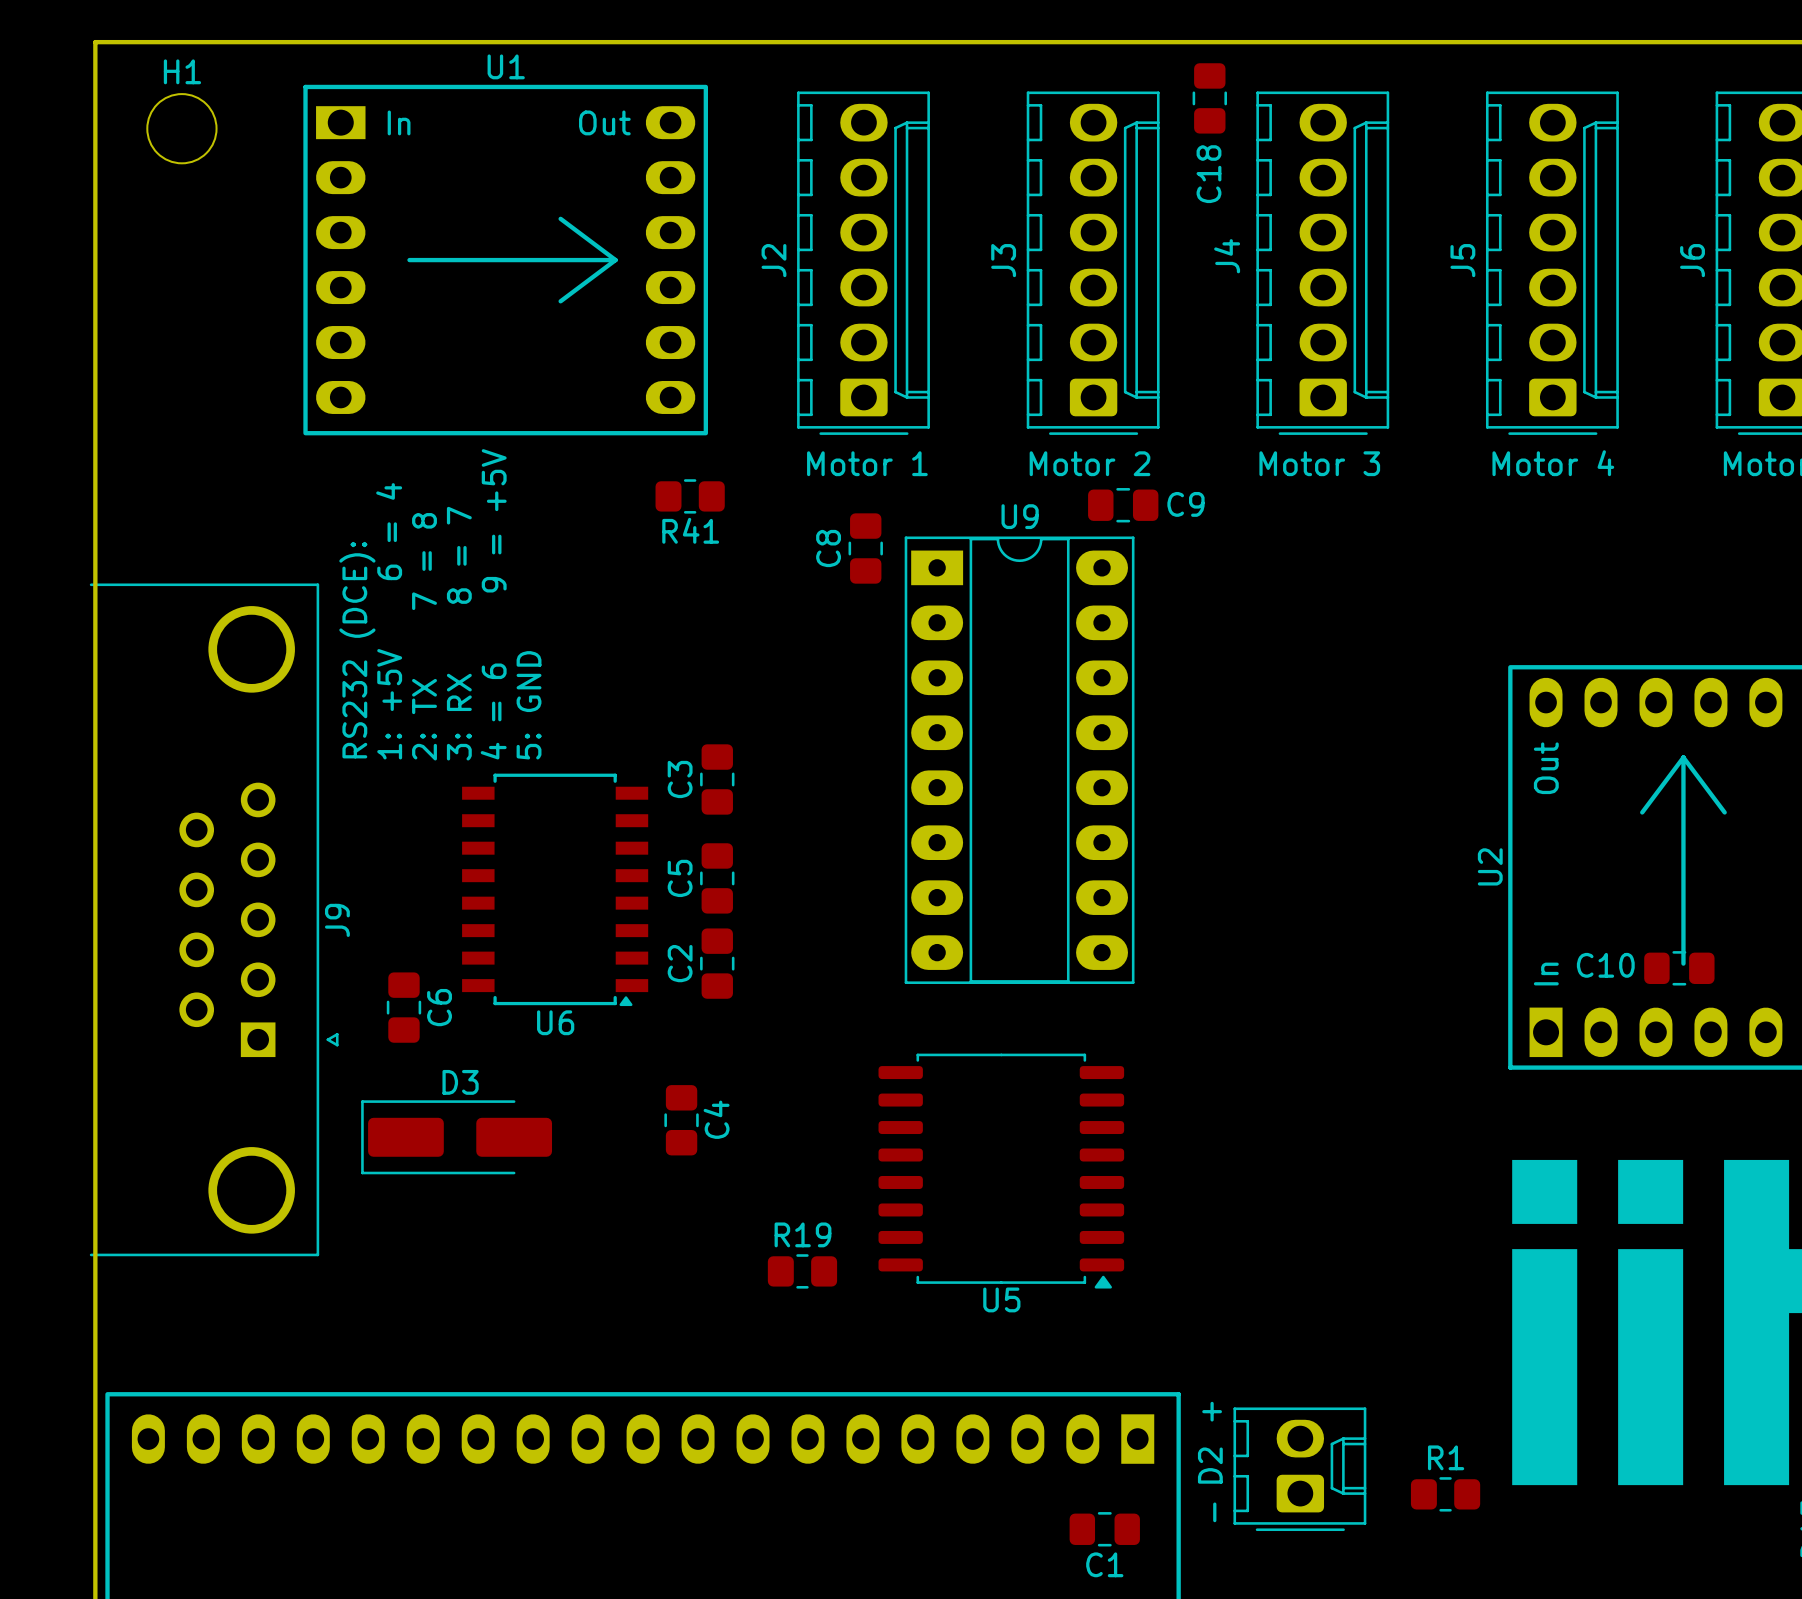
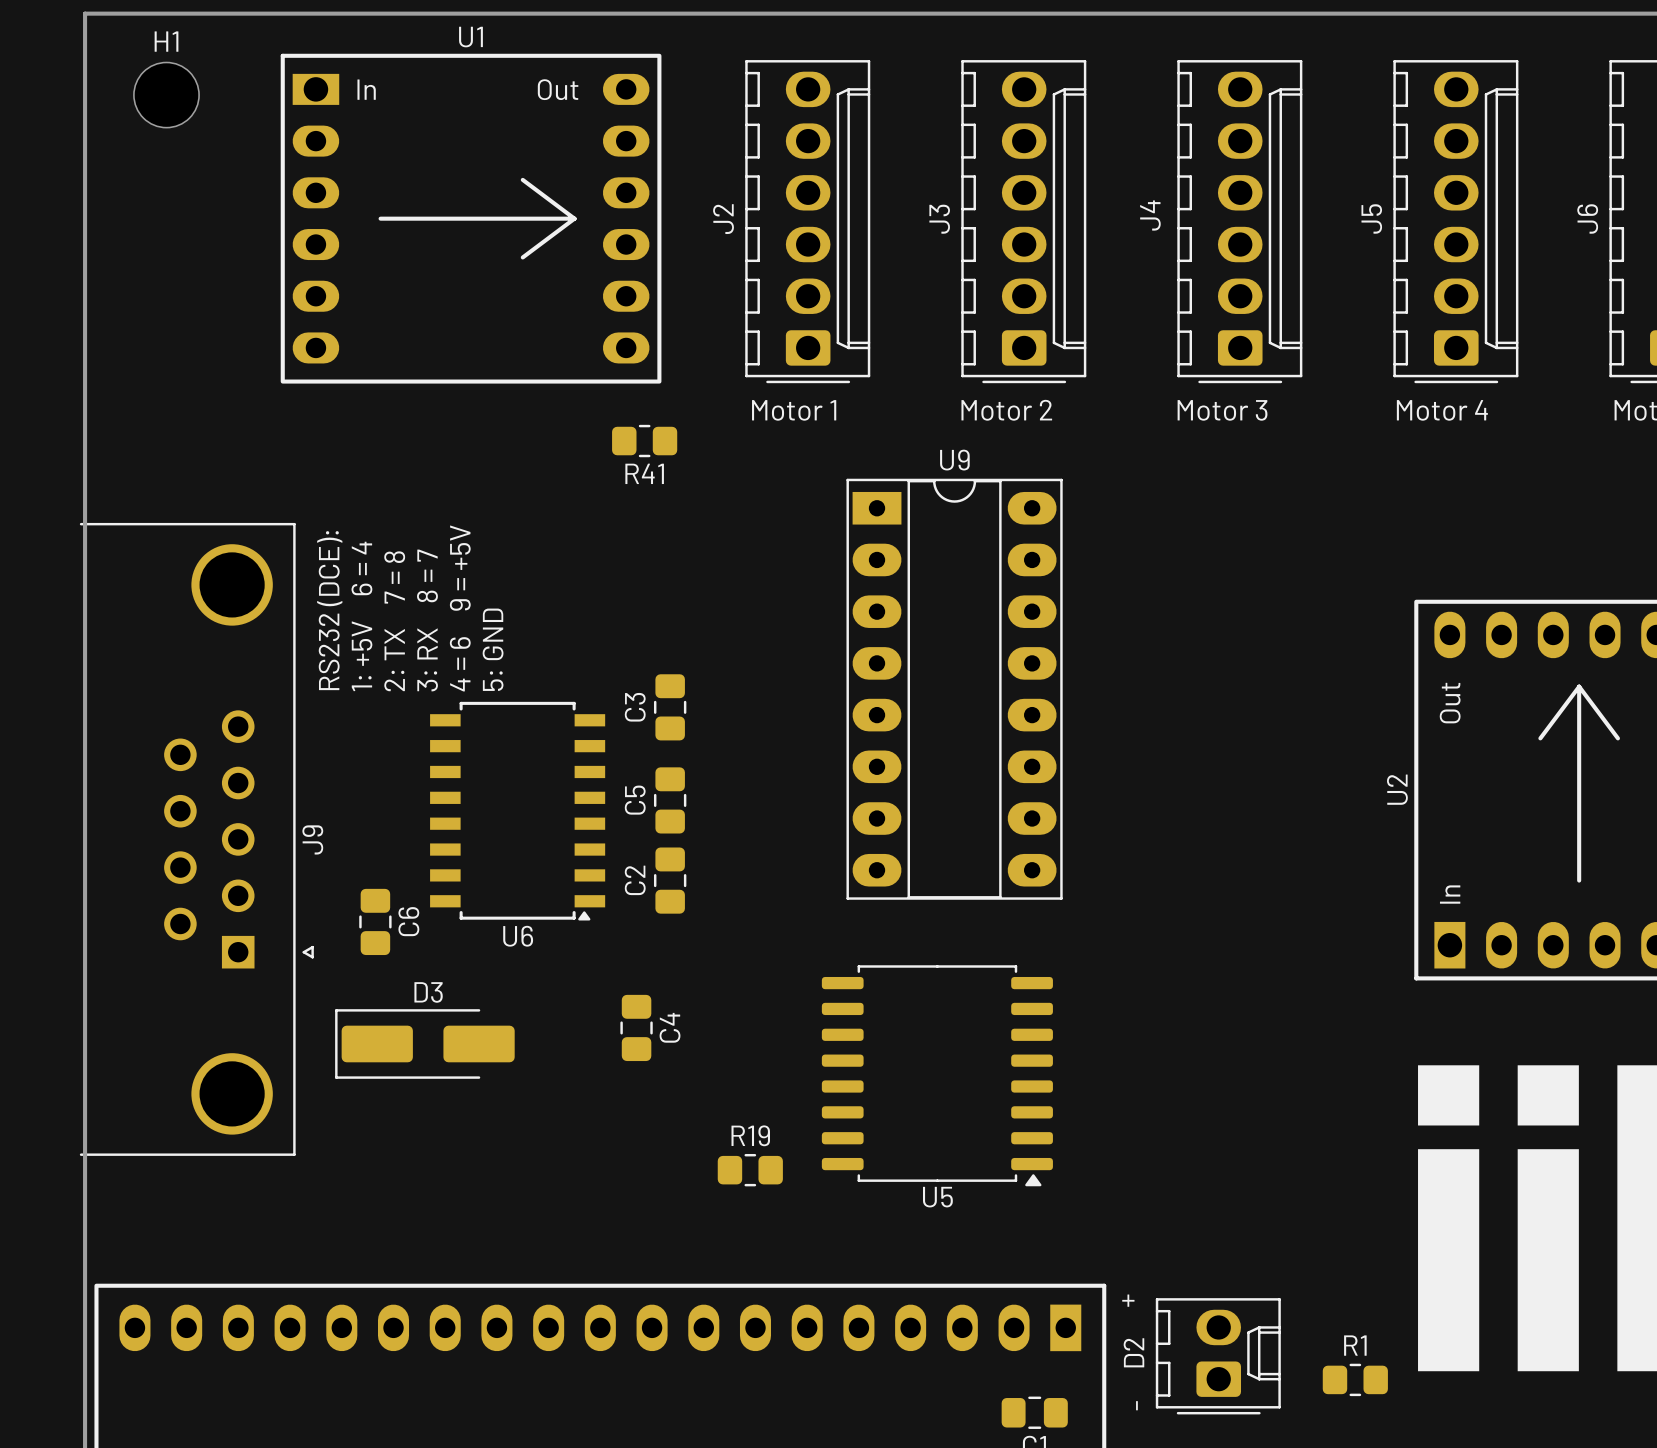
C18: (1209, 98) -> none
C9: (1123, 505) -> none
C8: (865, 548) -> none
C10: (1679, 968) -> none

